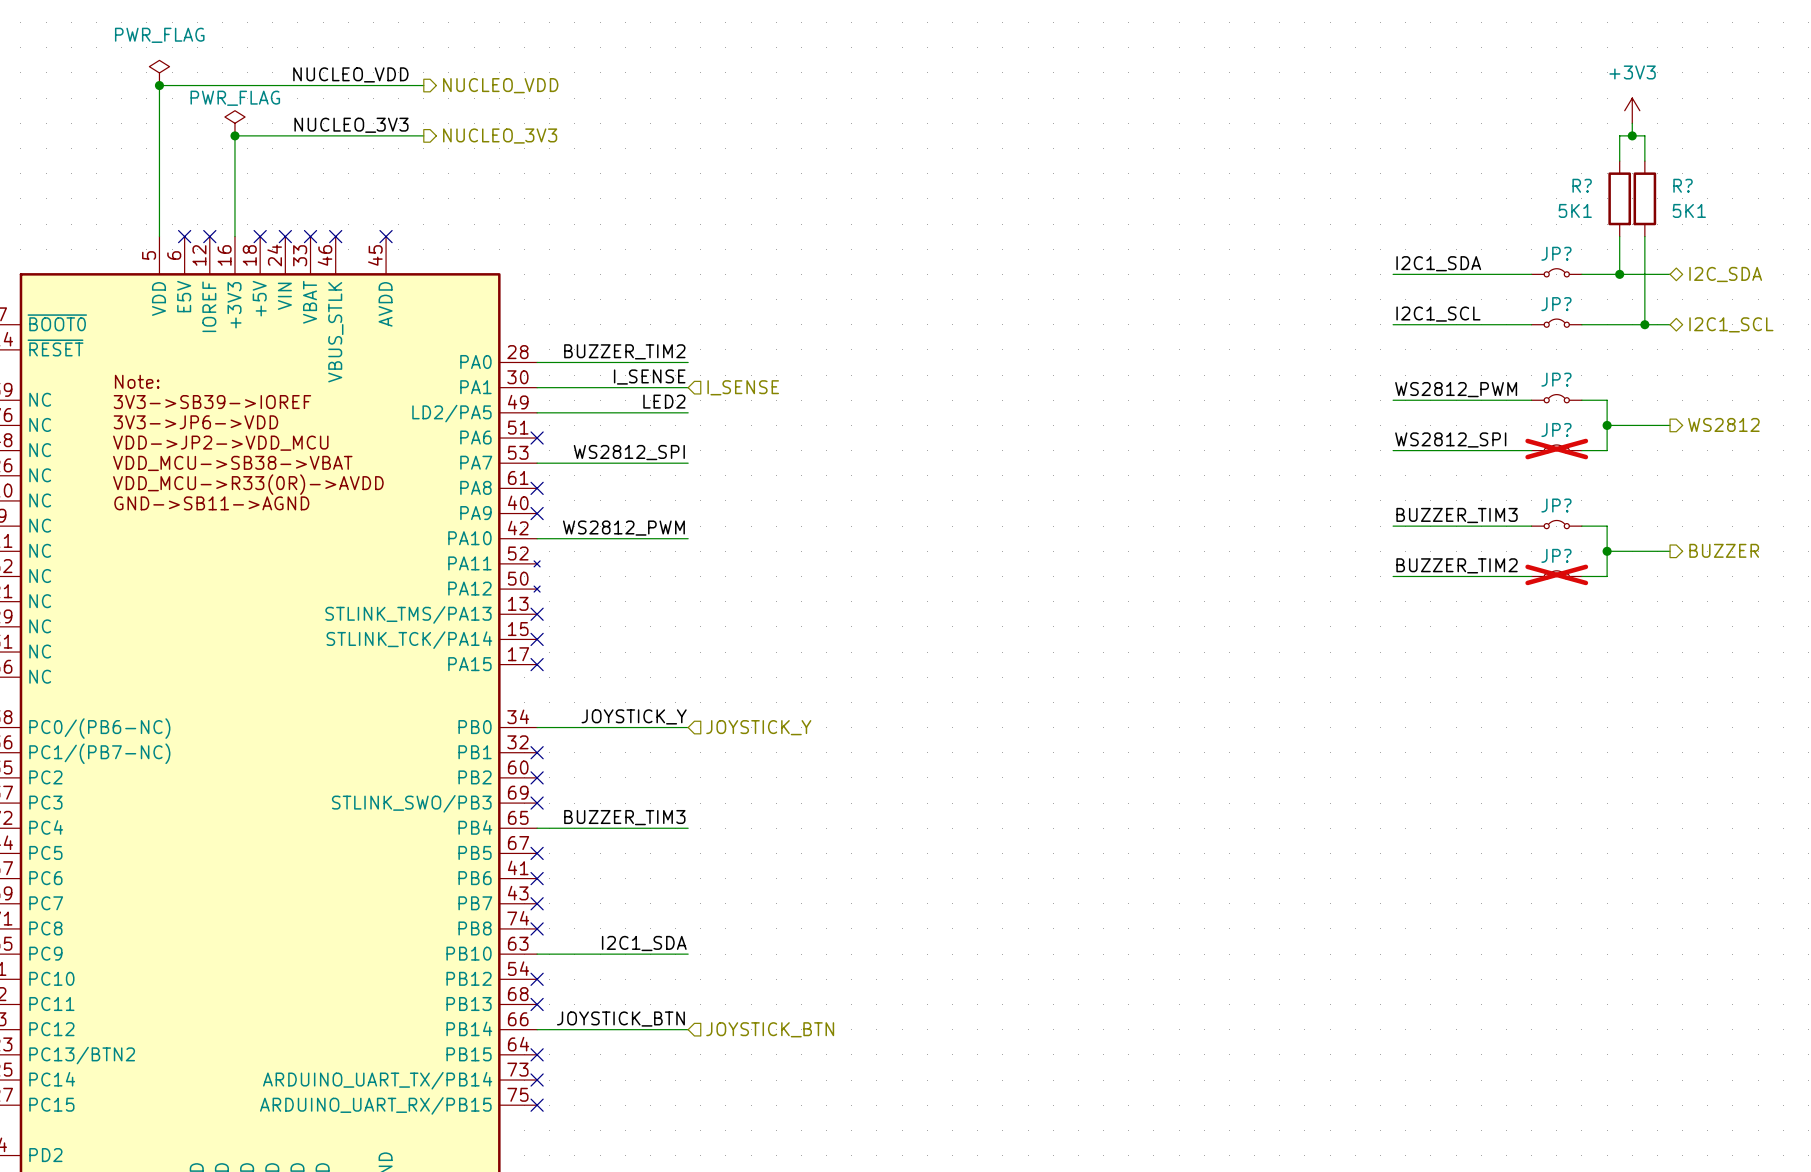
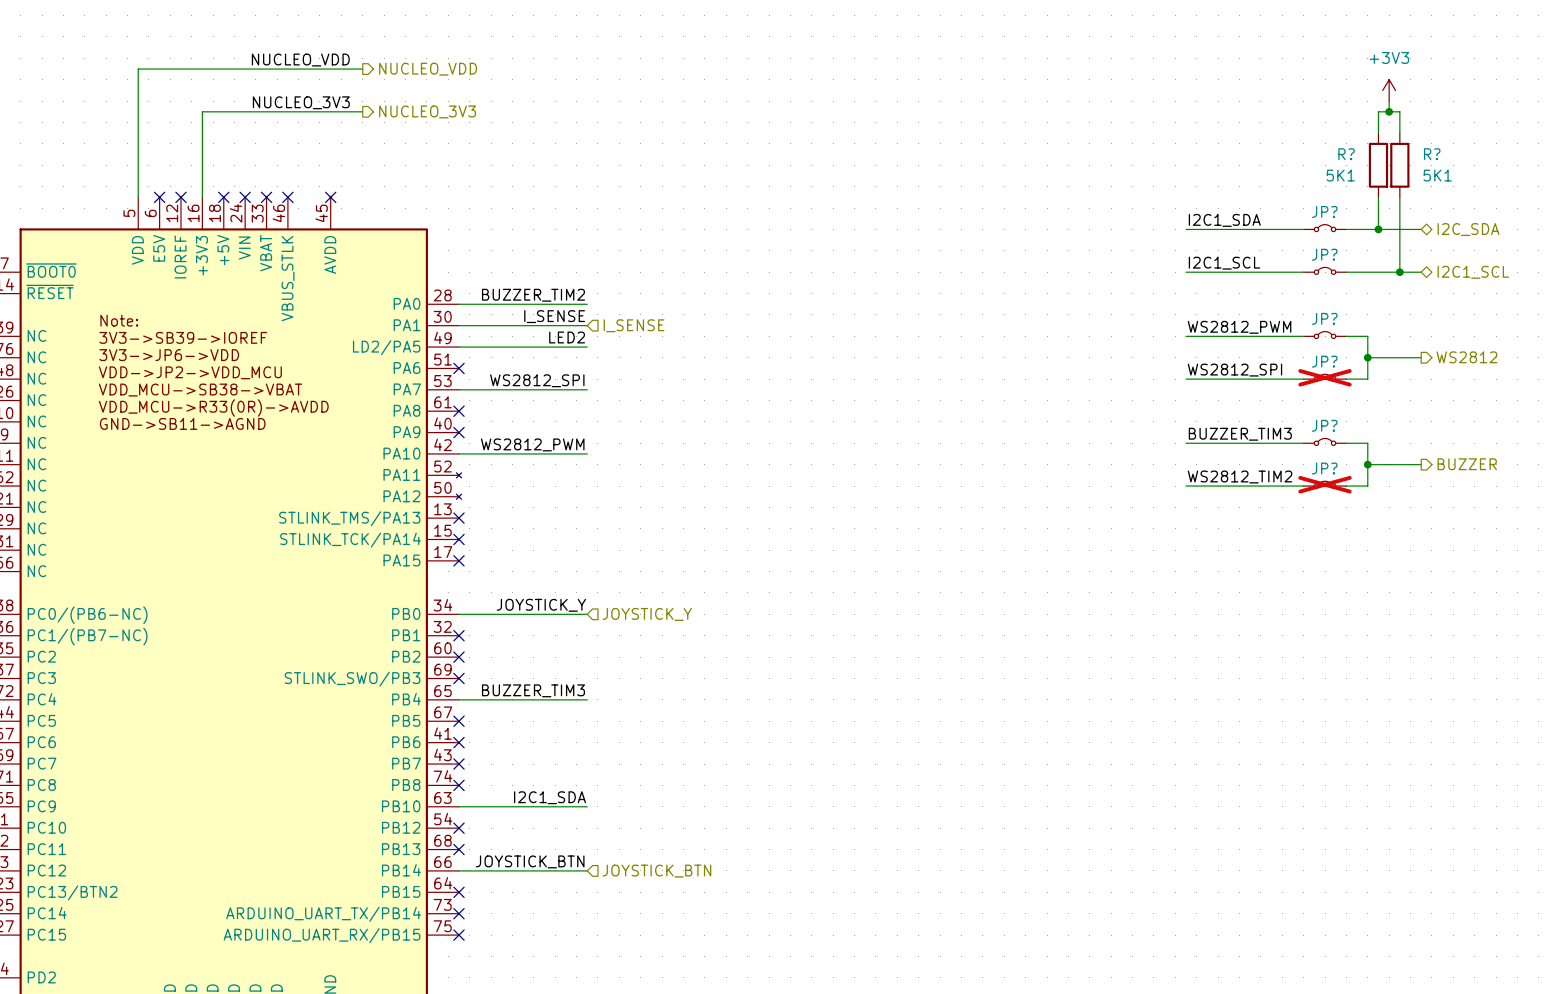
power symbol: PWR_FLAG (159, 72) -> none
junction: (159, 85) -> none
power symbol: PWR_FLAG (234, 123) -> none
junction: (234, 135) -> none
label: BUZZER_TIM2 (1457, 565) -> WS2812_TIM2 (1240, 477)

